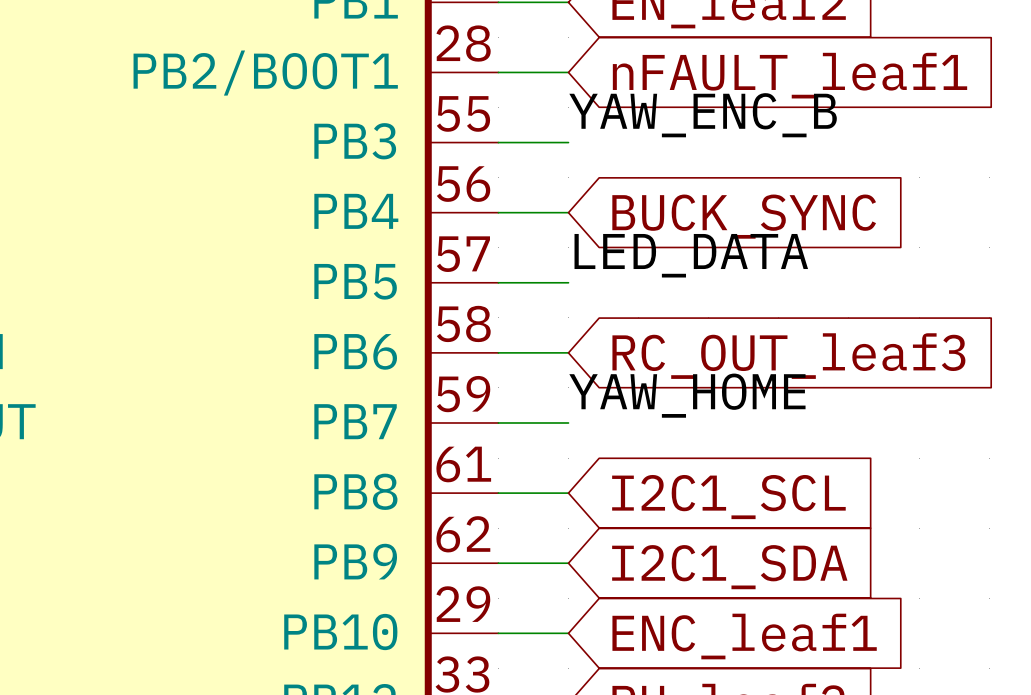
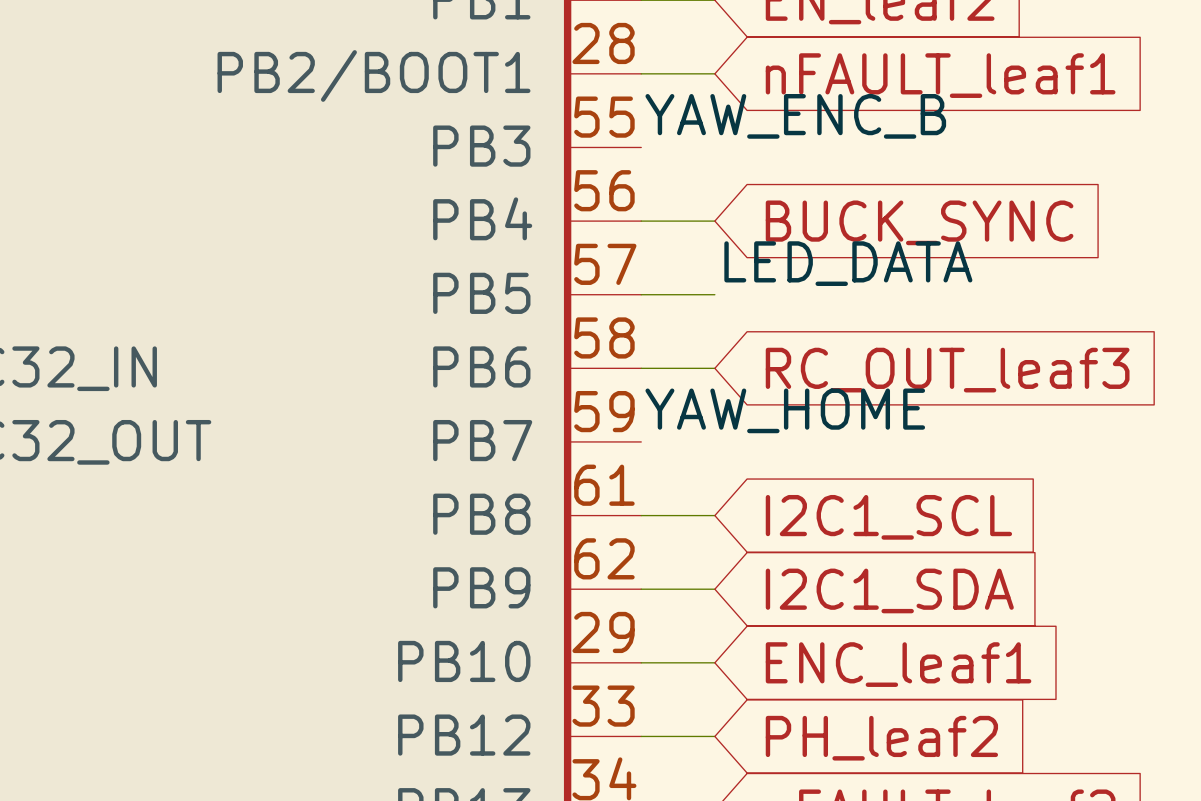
label position: YAW_ENC_B (703, 115) -> YAW_ENC_B (795, 116)
wire: (498, 142) (568, 142) -> none
label position: YAW_HOME (687, 395) -> YAW_HOME (785, 410)
wire: (498, 422) (568, 422) -> none

